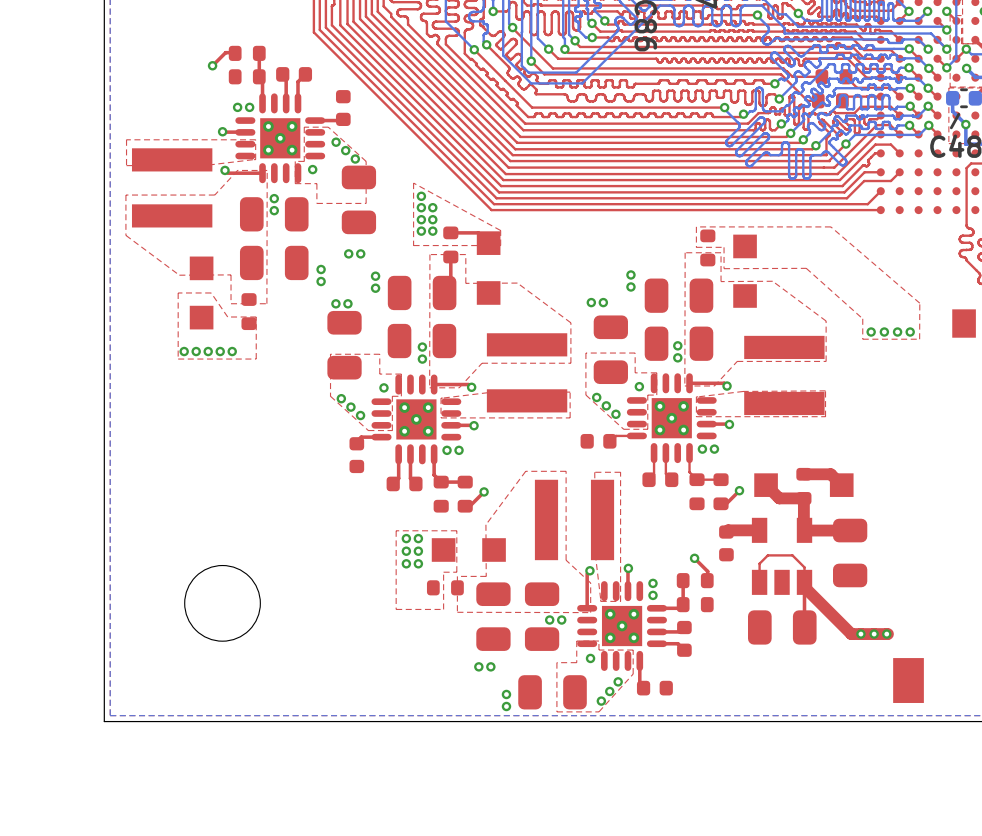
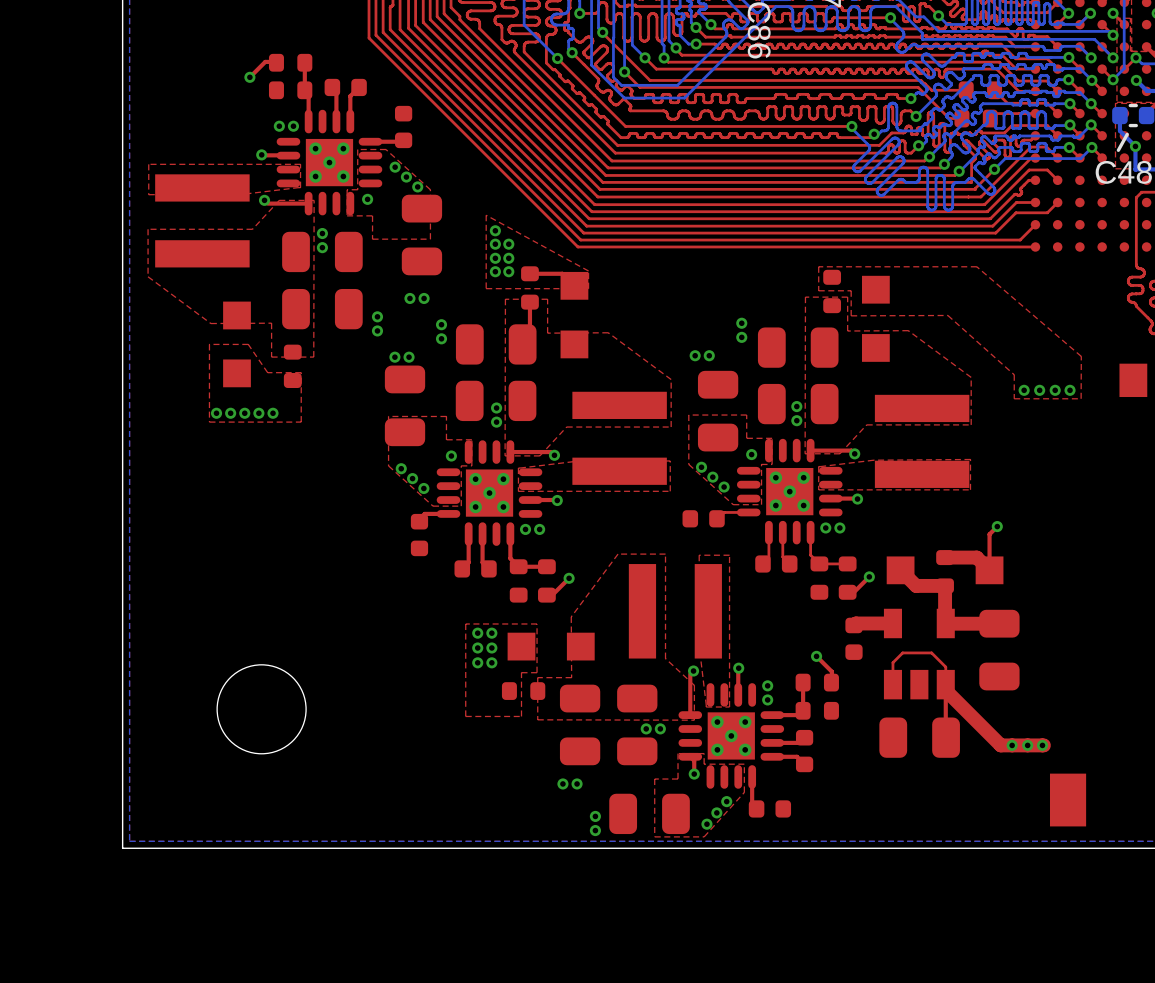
top track: none -> (997, 526) (989, 534) (989, 570)
via: none -> (997, 526)
top track: none -> (690, 756) (694, 760) (694, 774)

